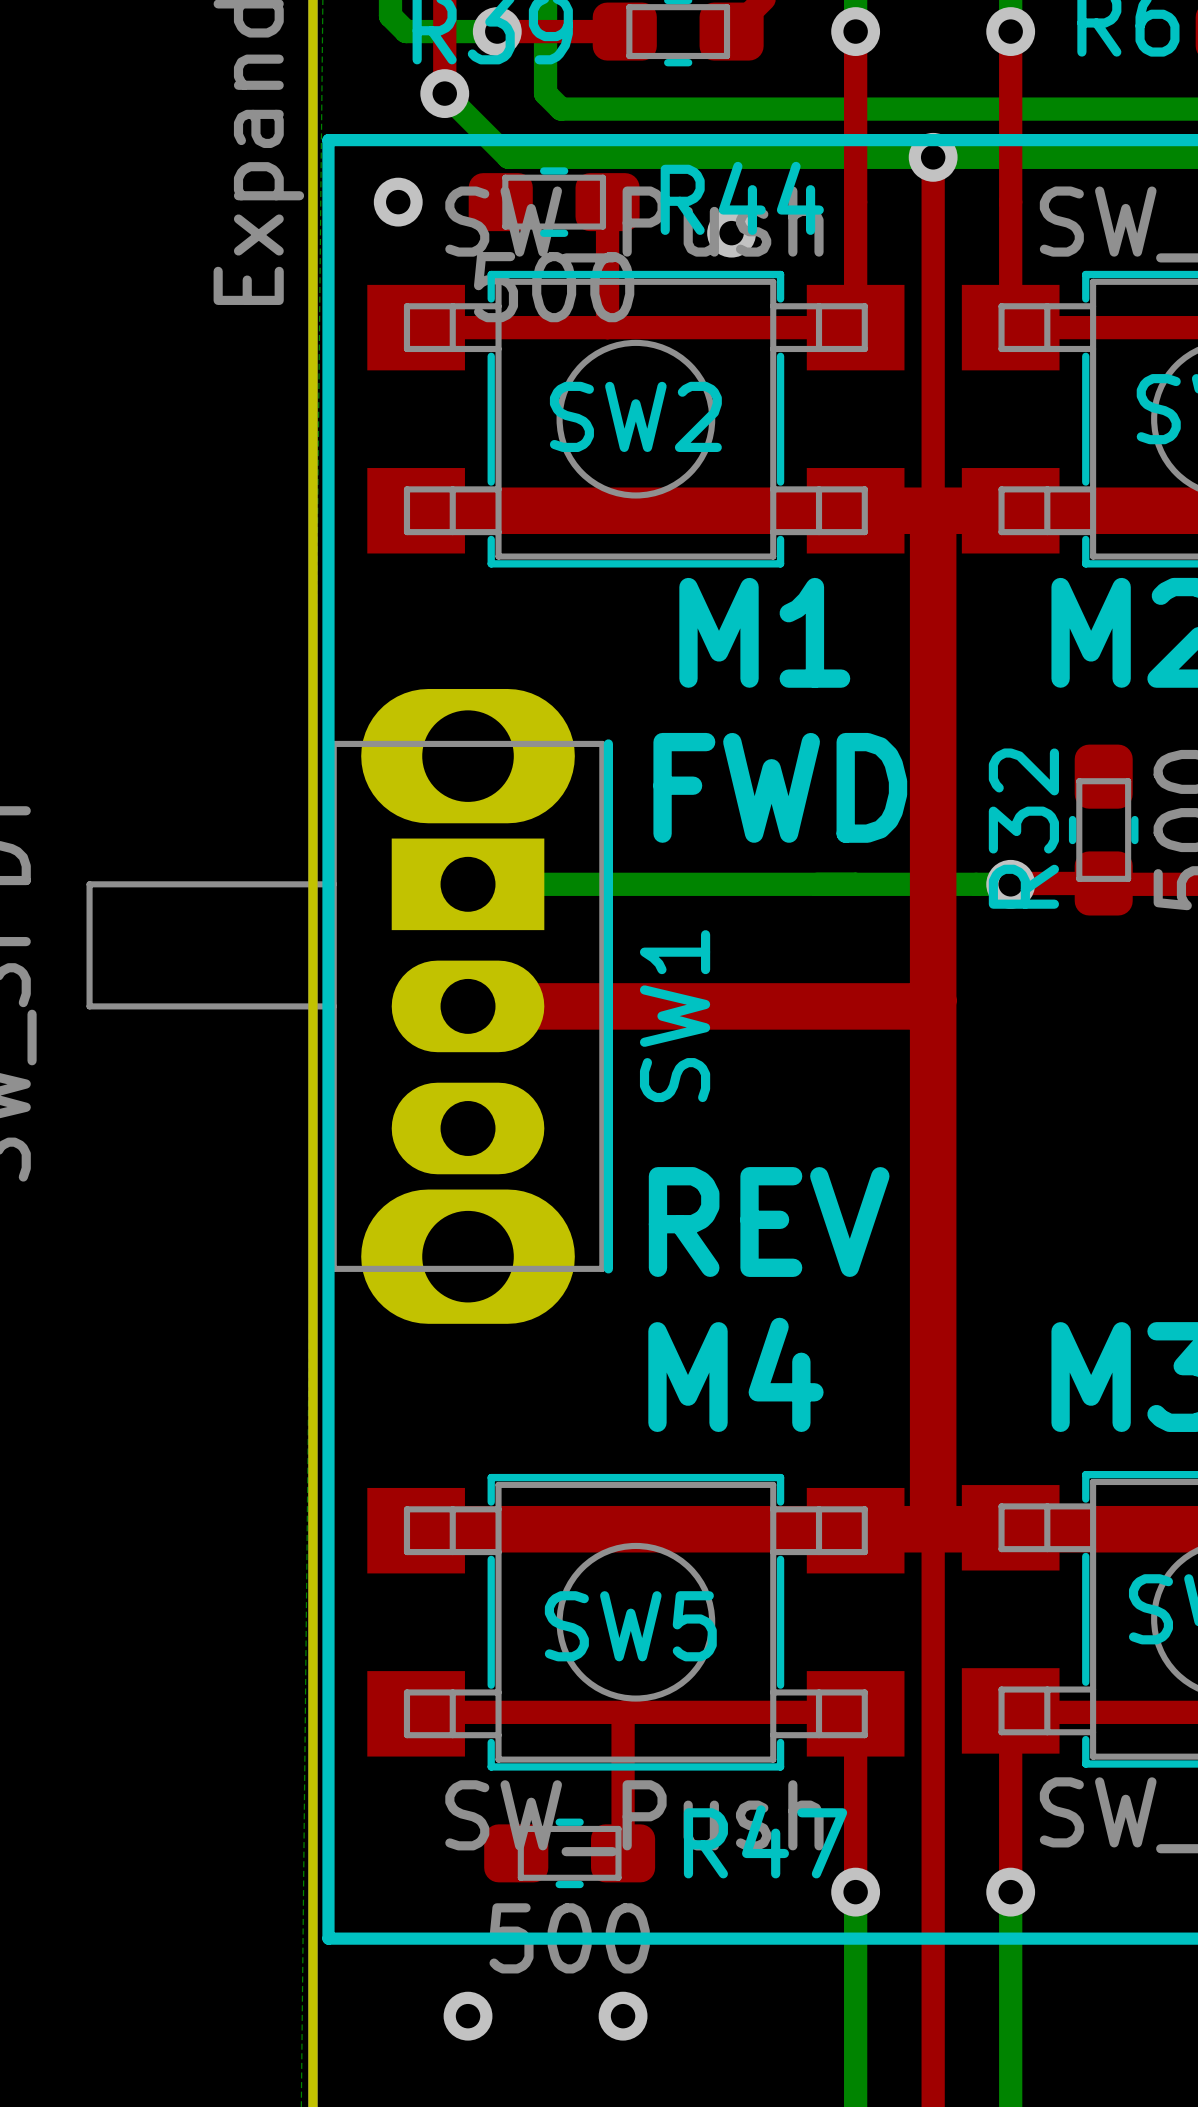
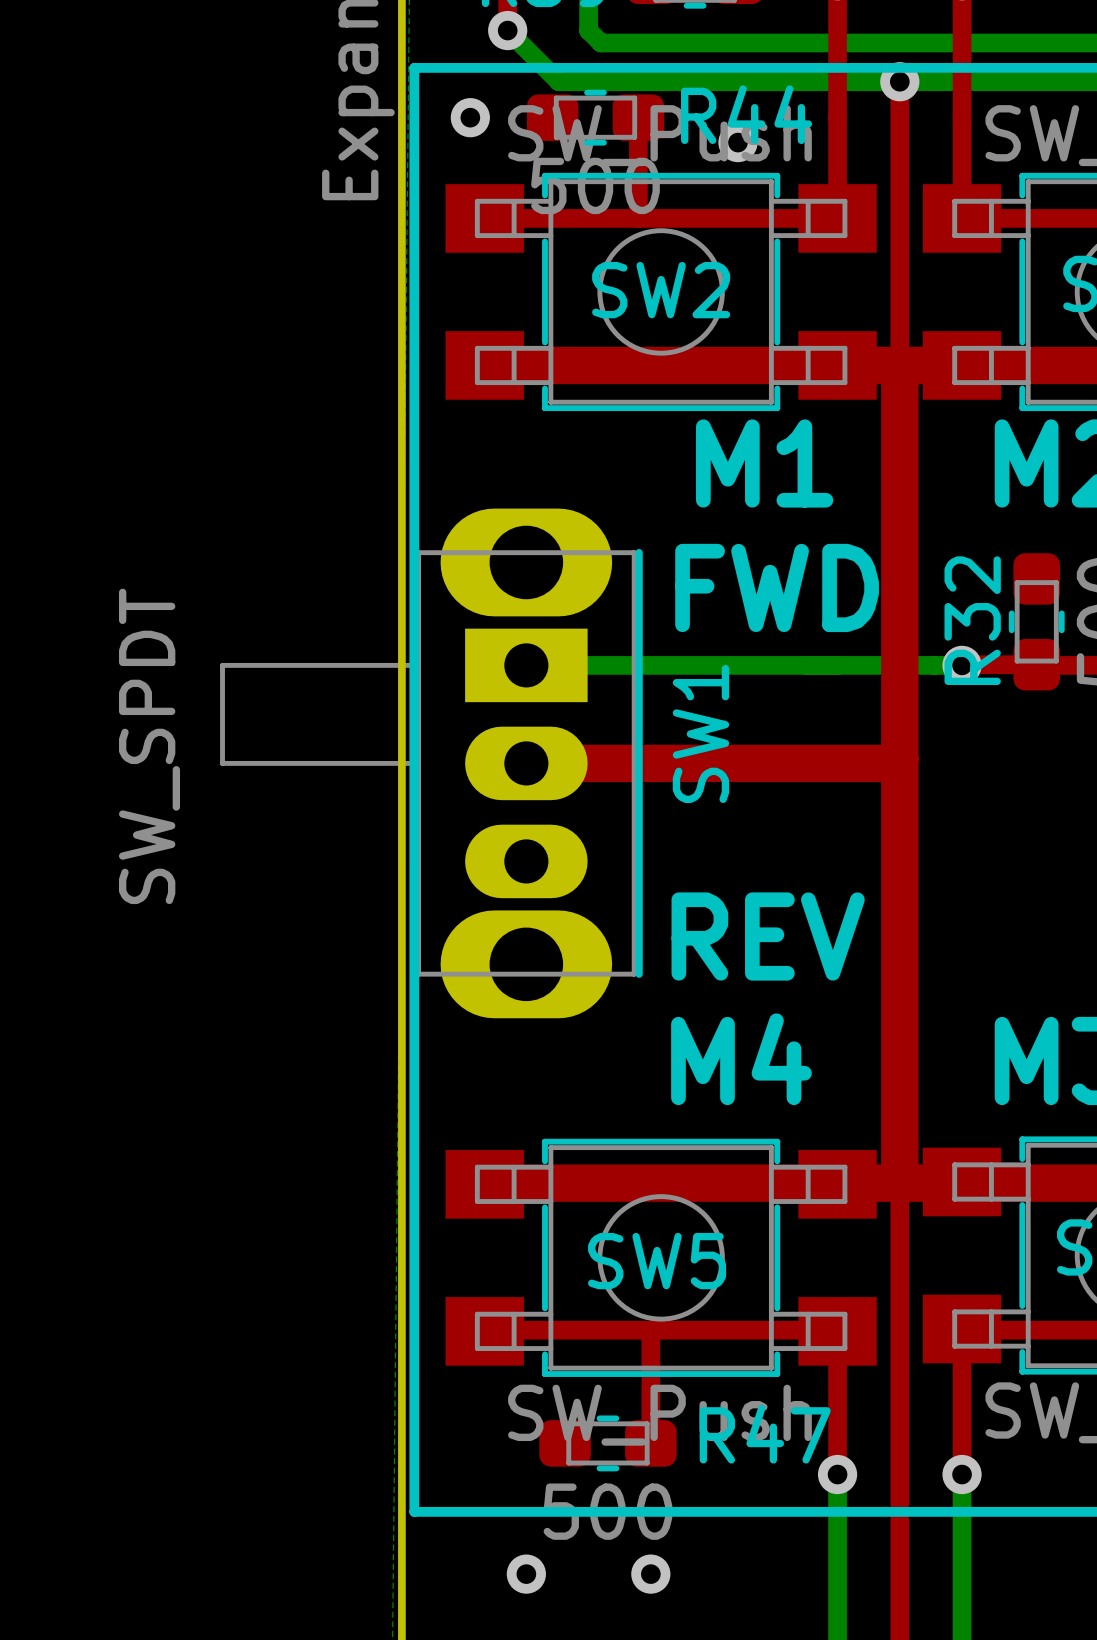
SW1 name position: SW1 (675, 1016) -> SW1 (700, 734)

